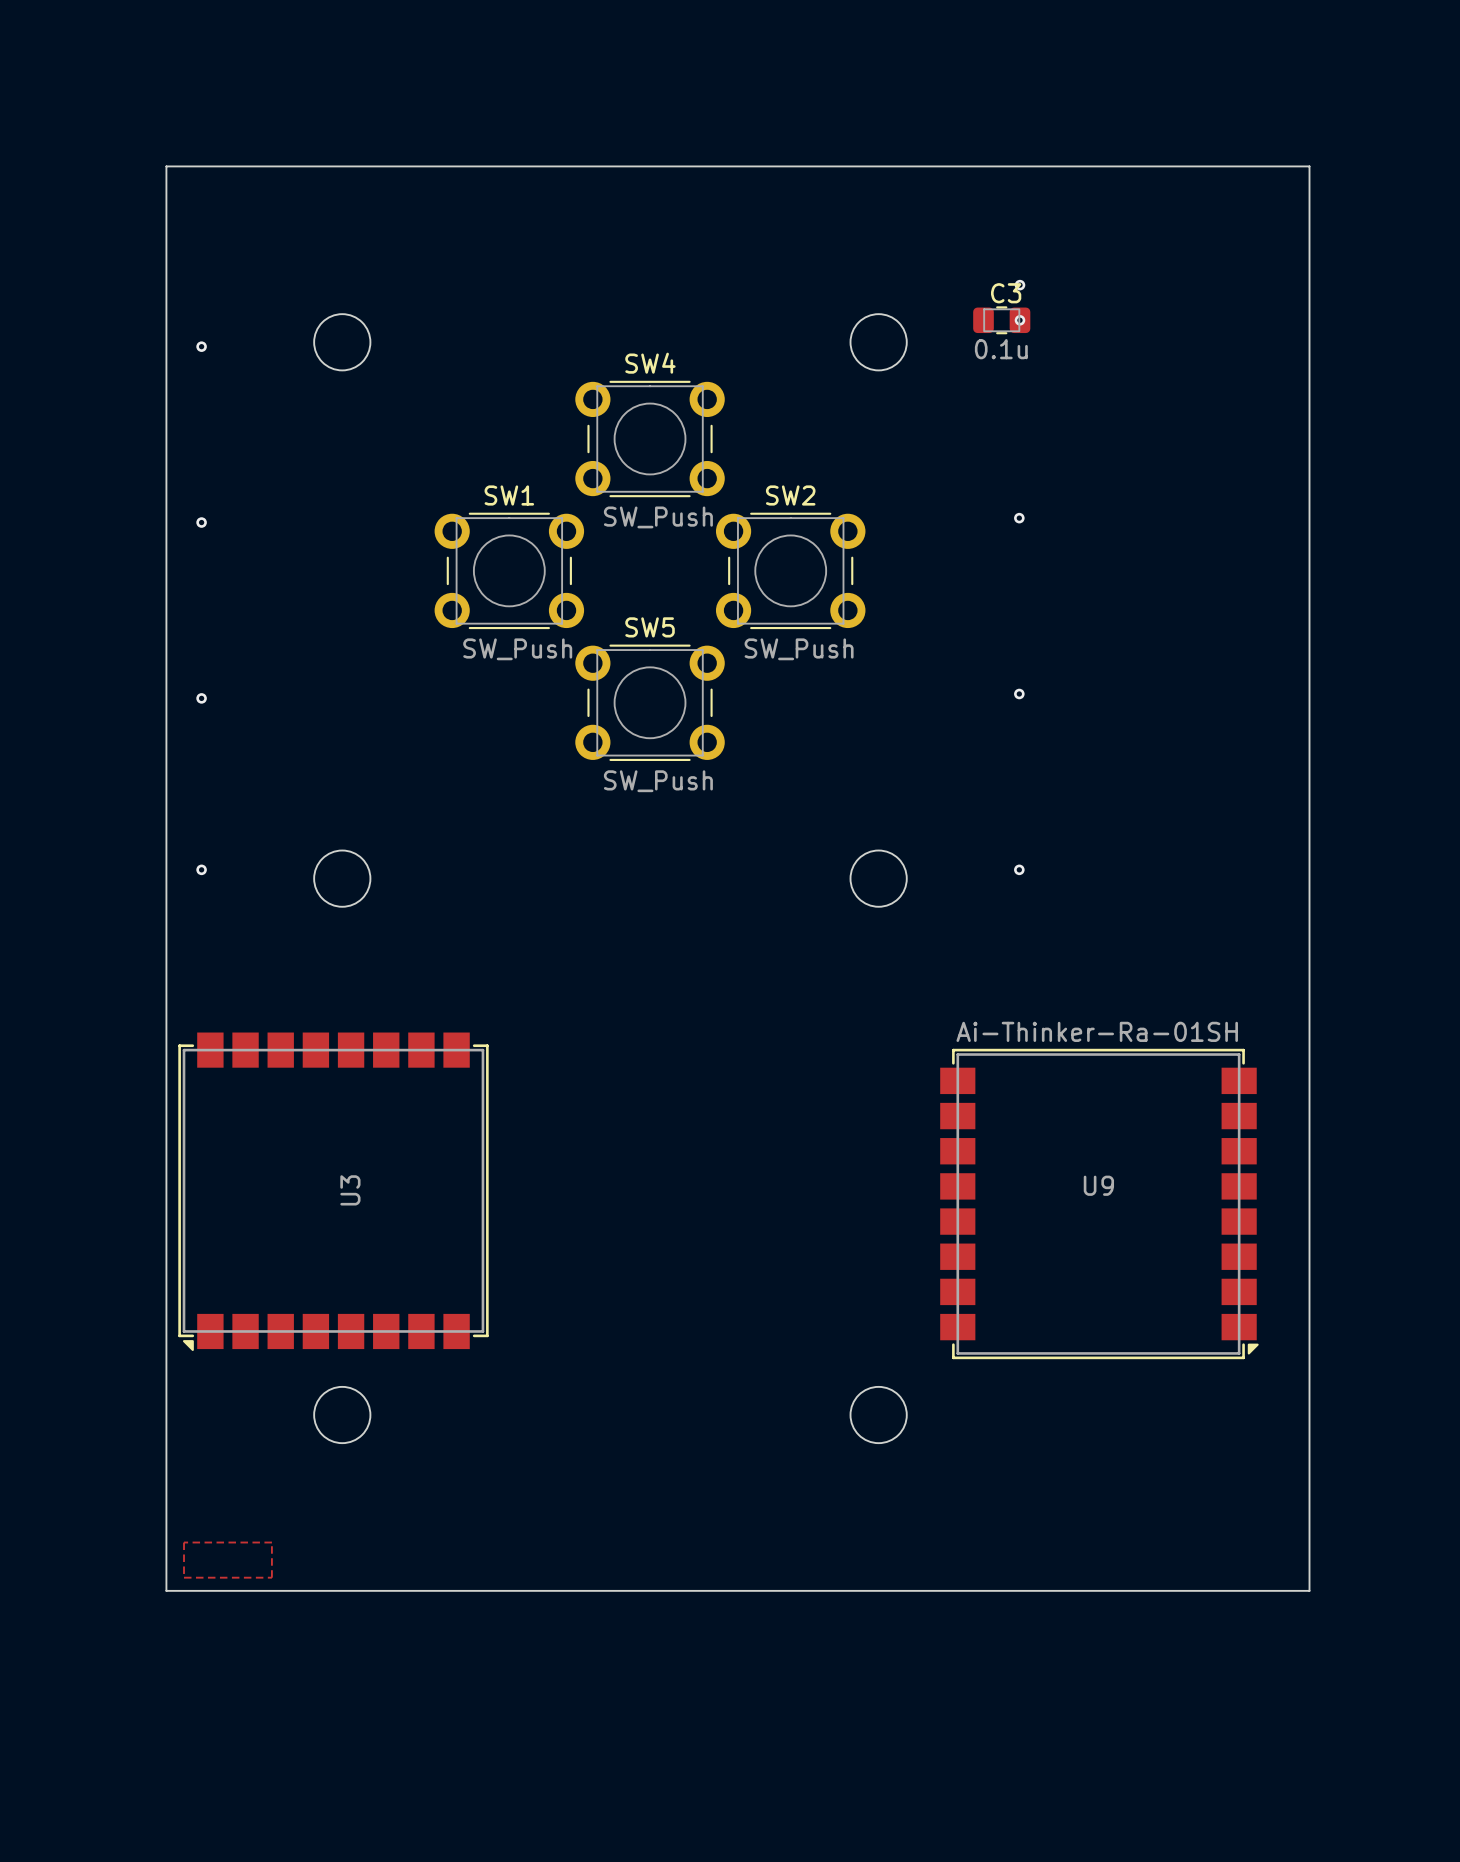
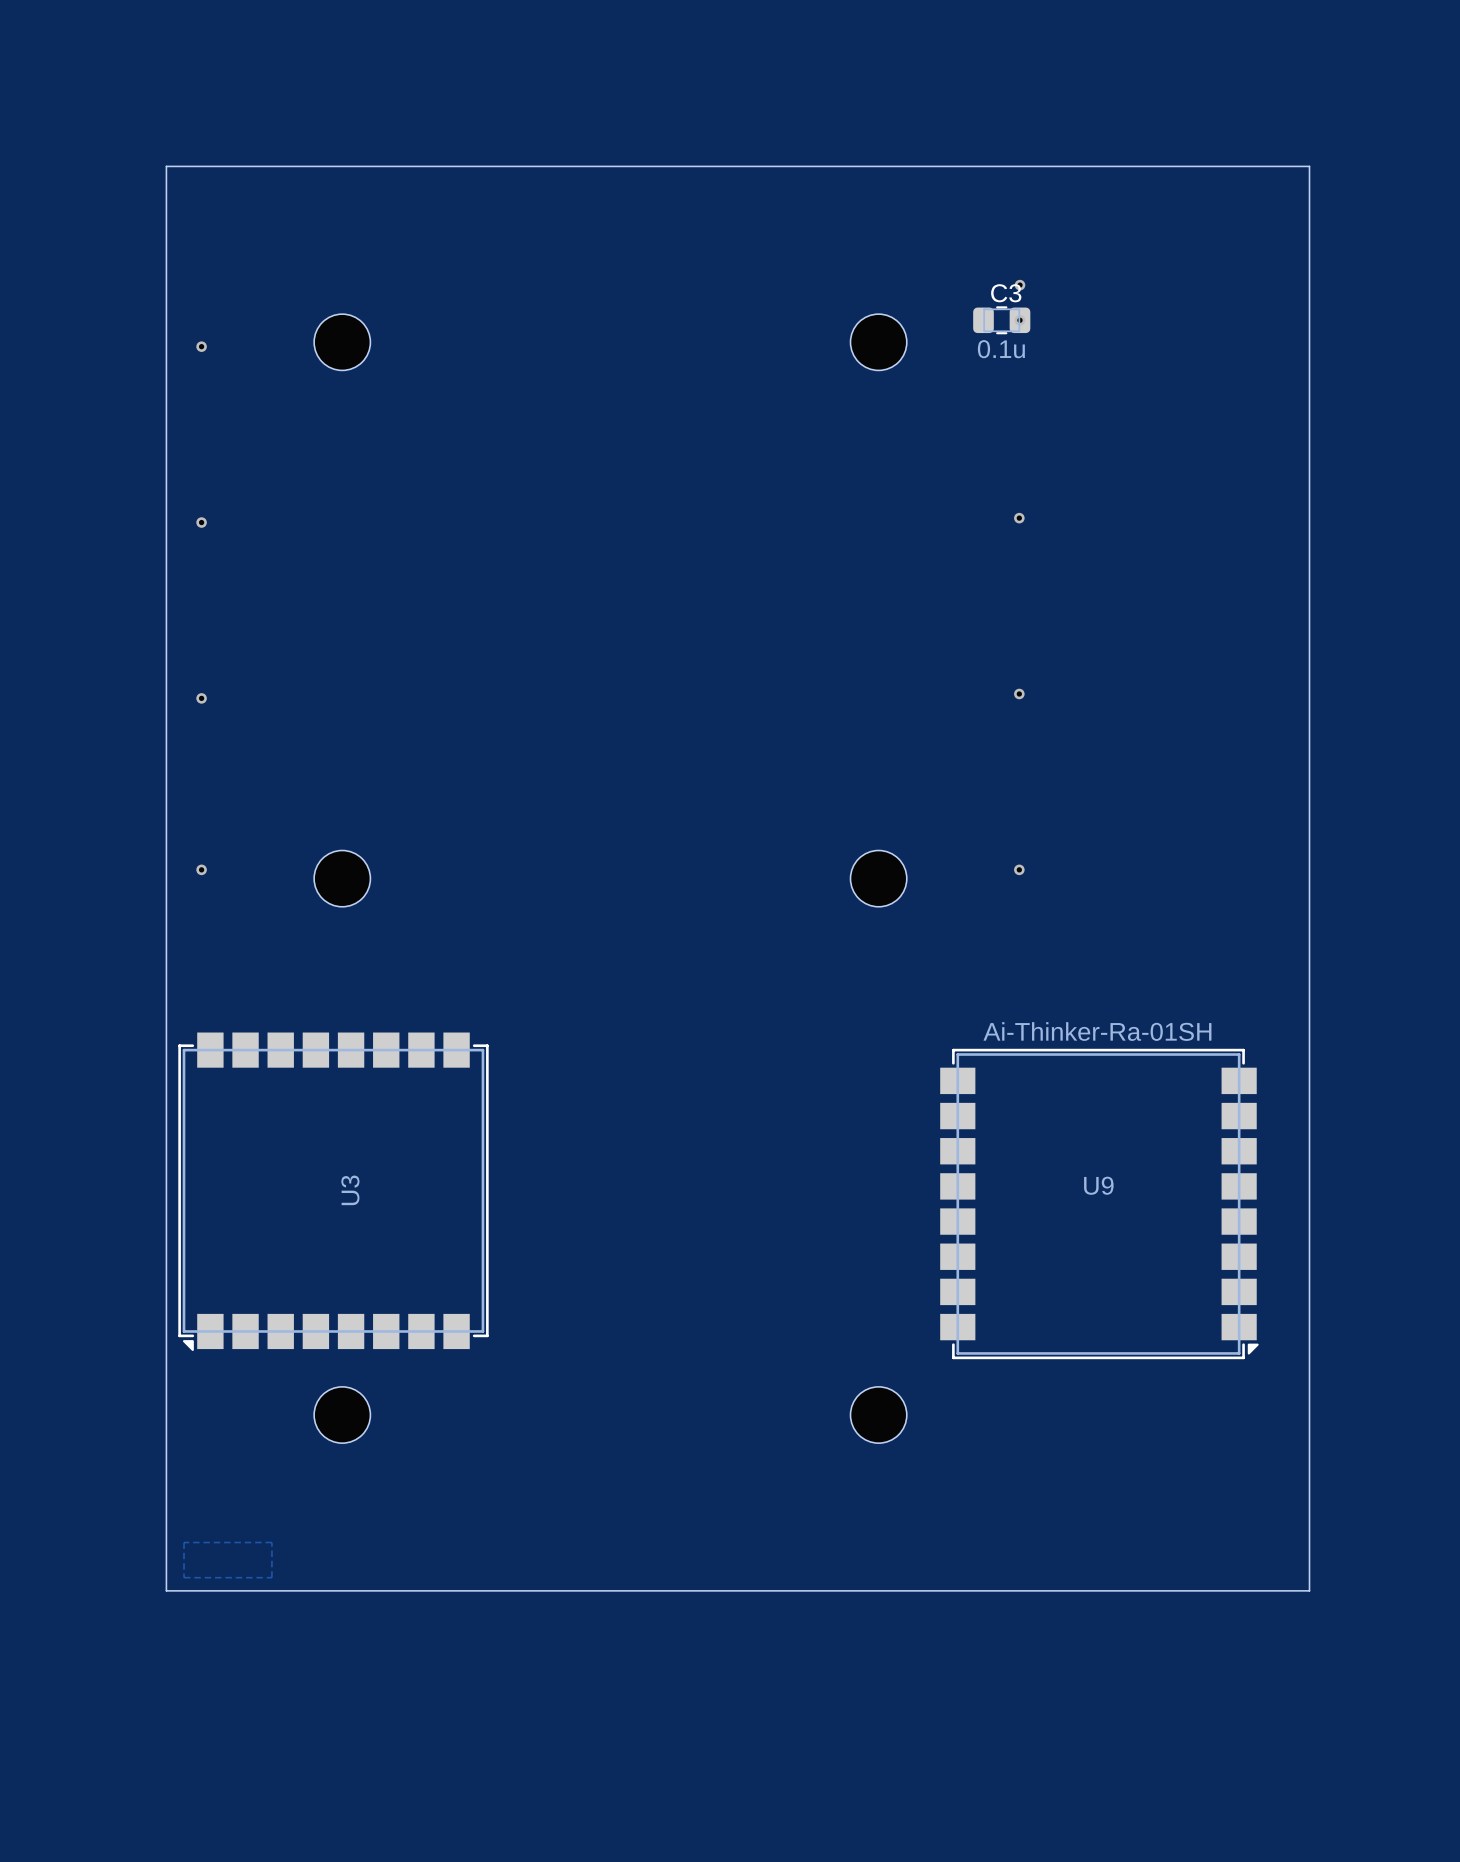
SW4: SW_Push (650, 439) -> none
SW1: SW_Push (509, 570) -> none
SW2: SW_Push (790, 570) -> none
SW5: SW_Push (650, 702) -> none

